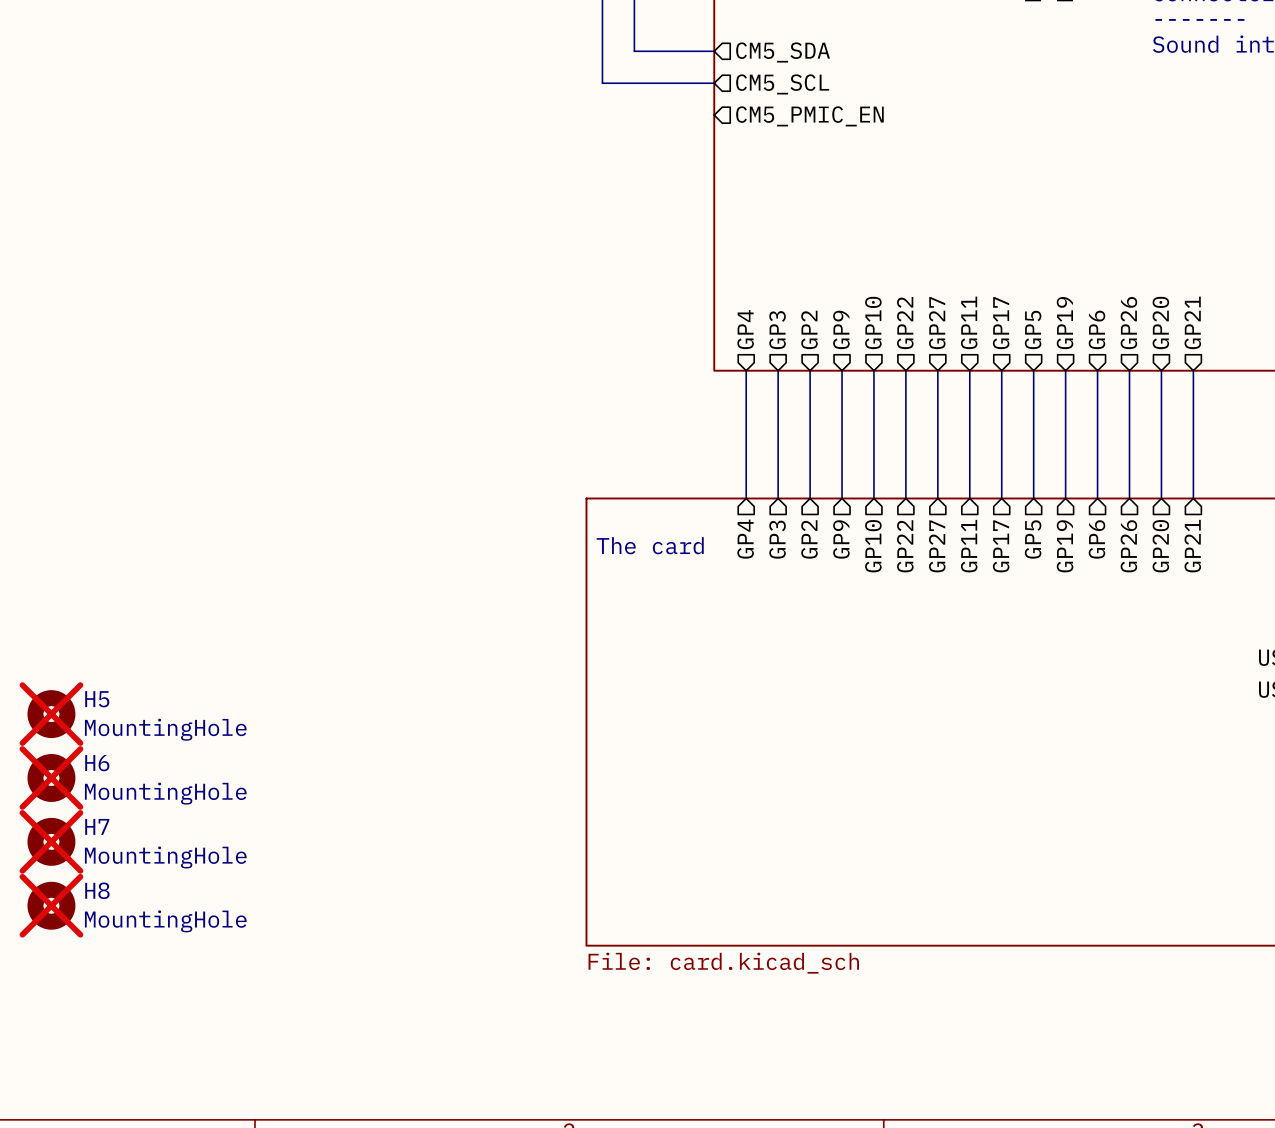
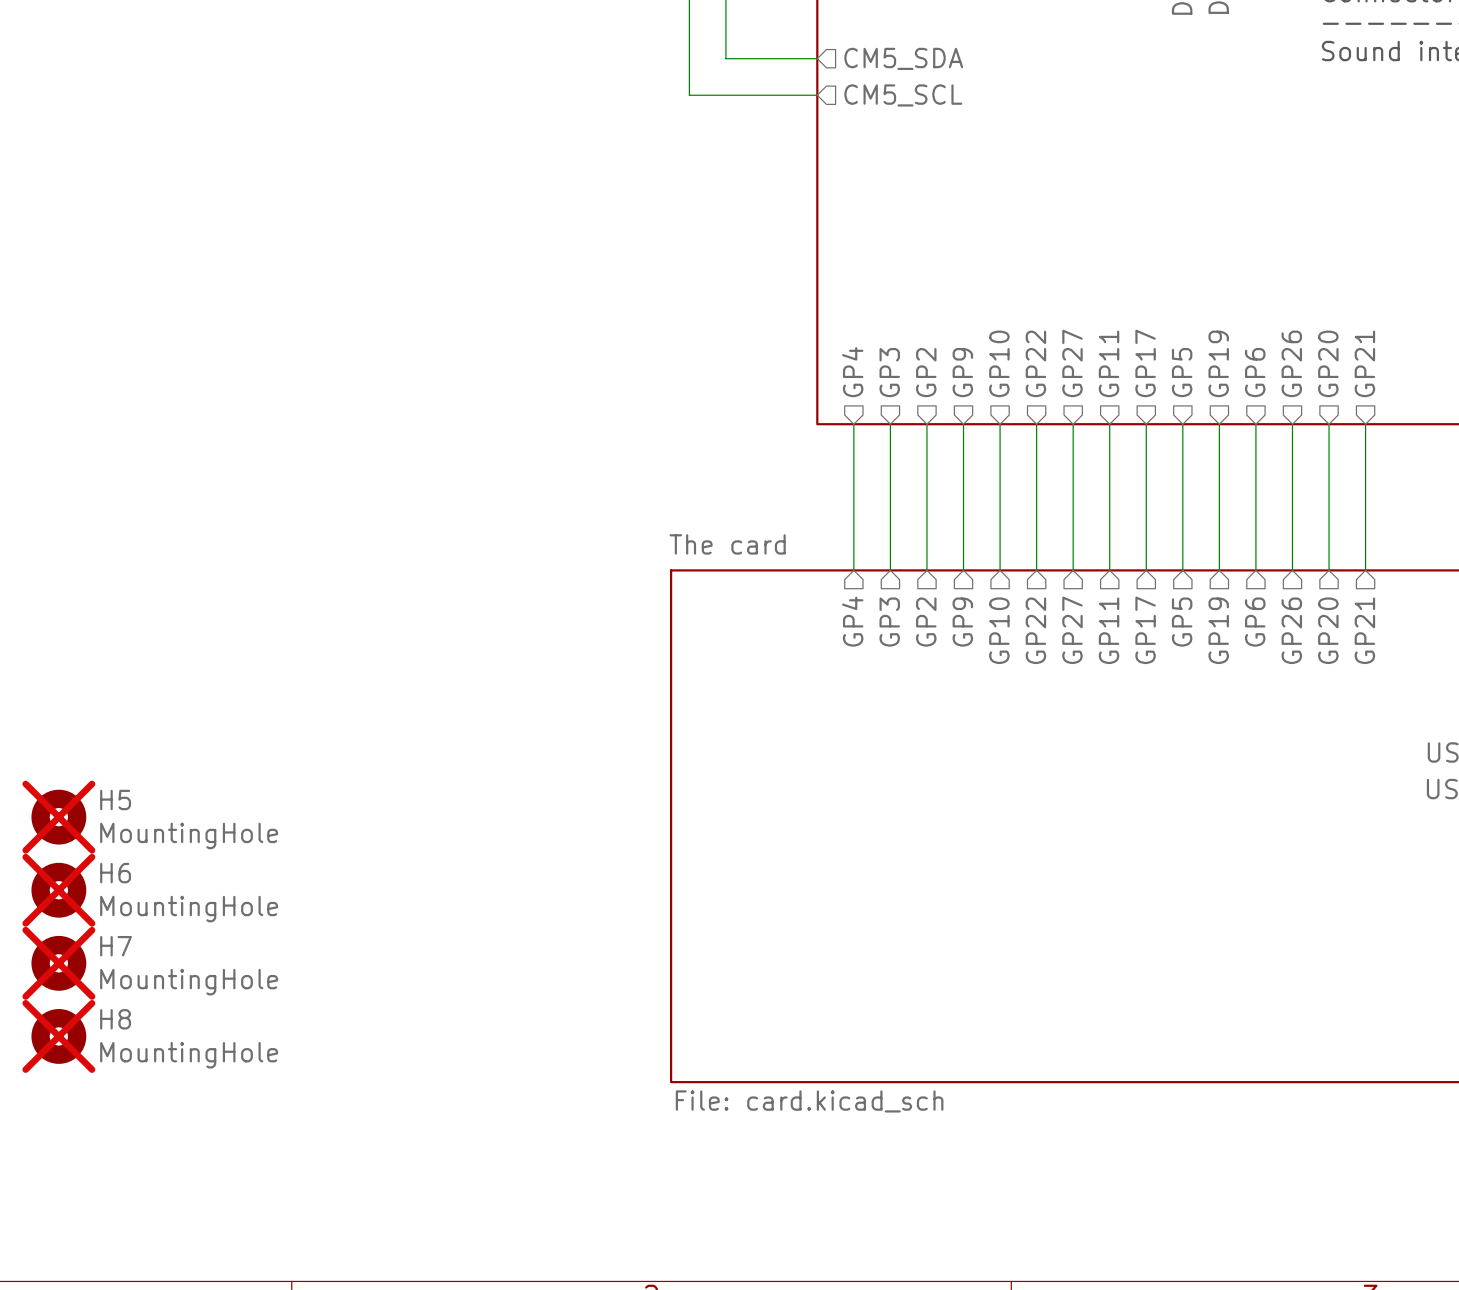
sheet pin: CM5_PMIC_EN (809, 116) -> none
sheet The card name position: The card (650, 545) -> The card (727, 544)

